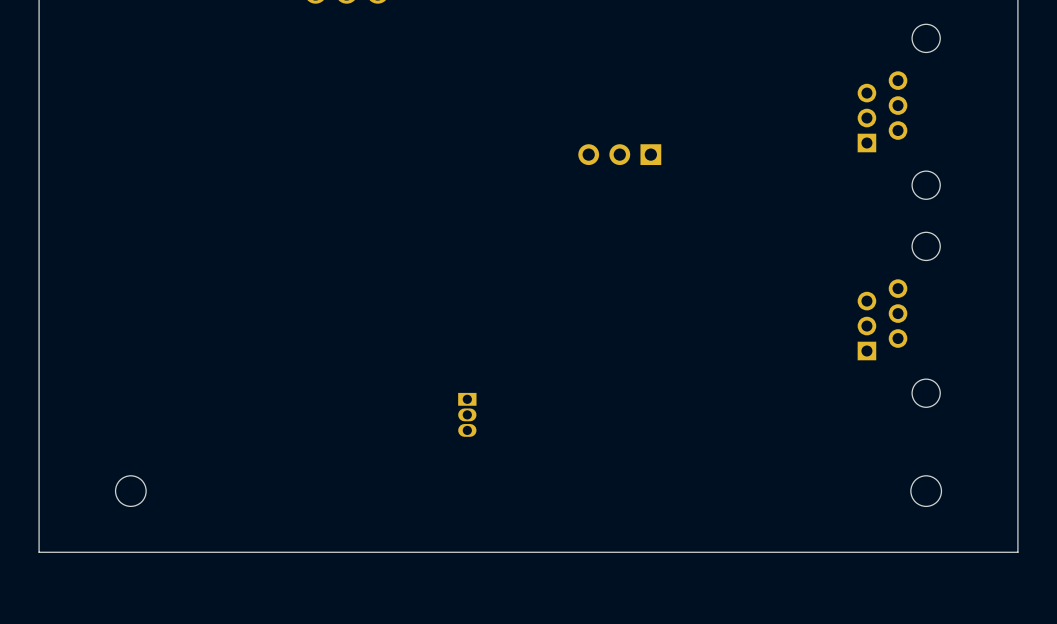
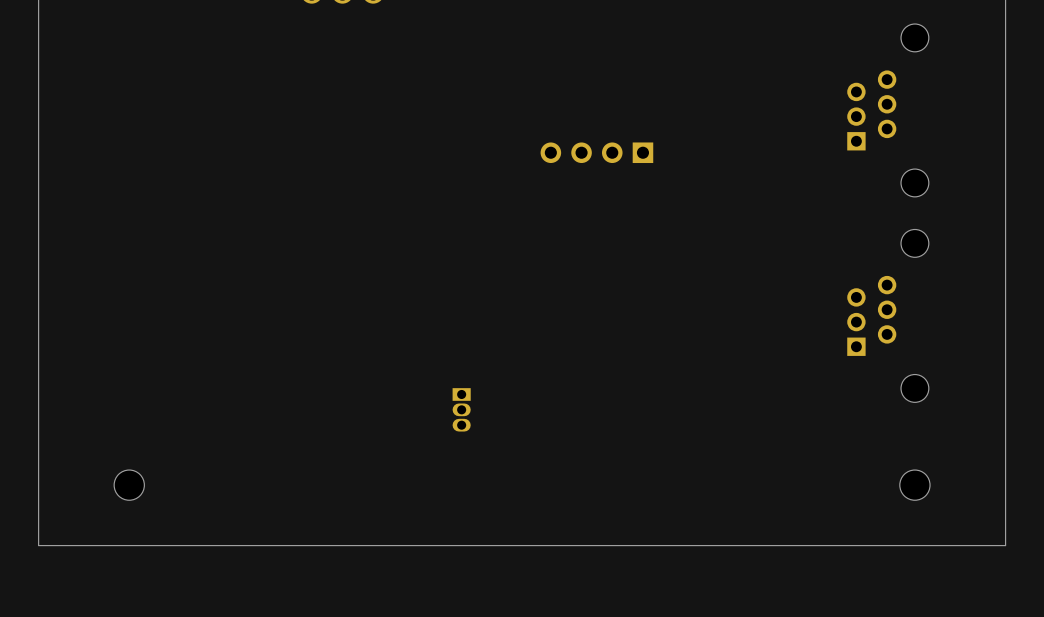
part: none -> (596, 152)

